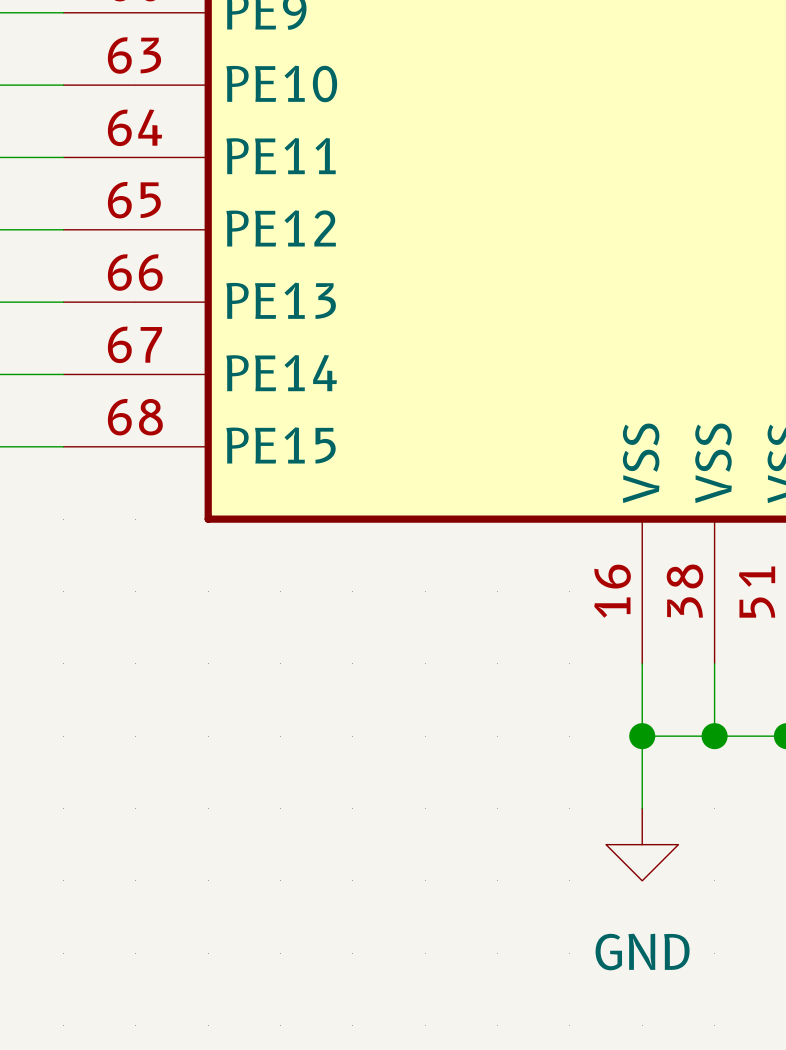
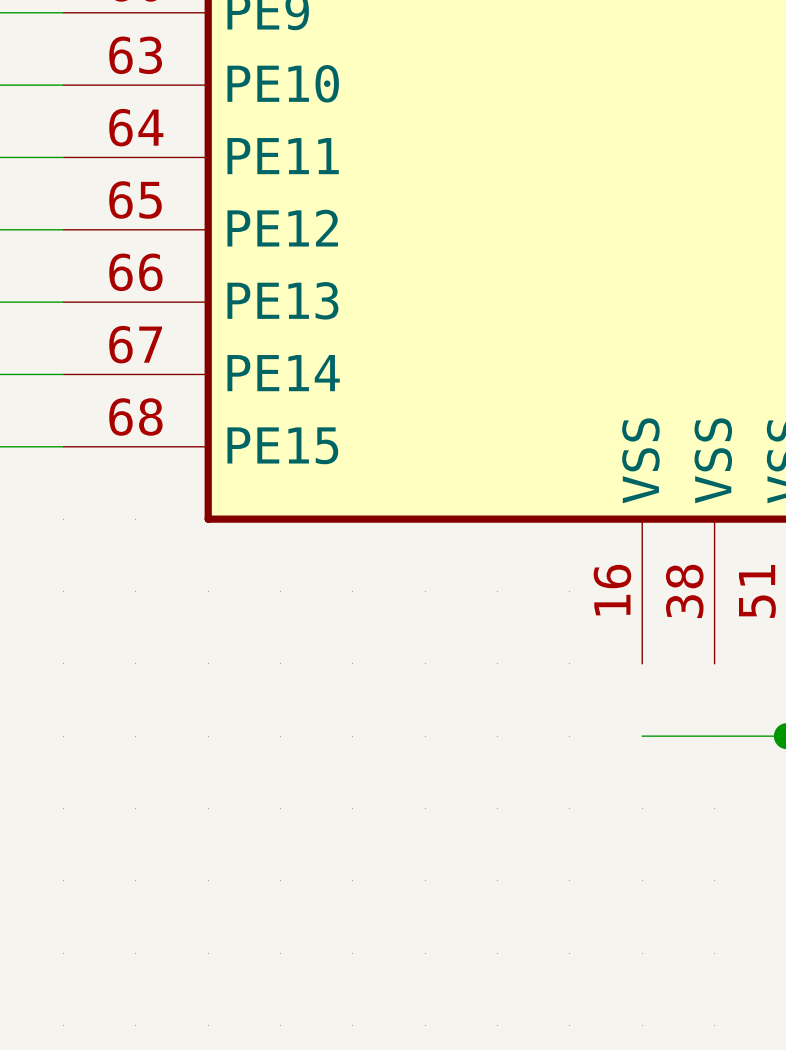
wire: (642, 663) (642, 808) -> none
wire: (714, 663) (714, 736) -> none
junction: (642, 736) -> none
junction: (714, 736) -> none
power symbol: GND (642, 844) -> none

